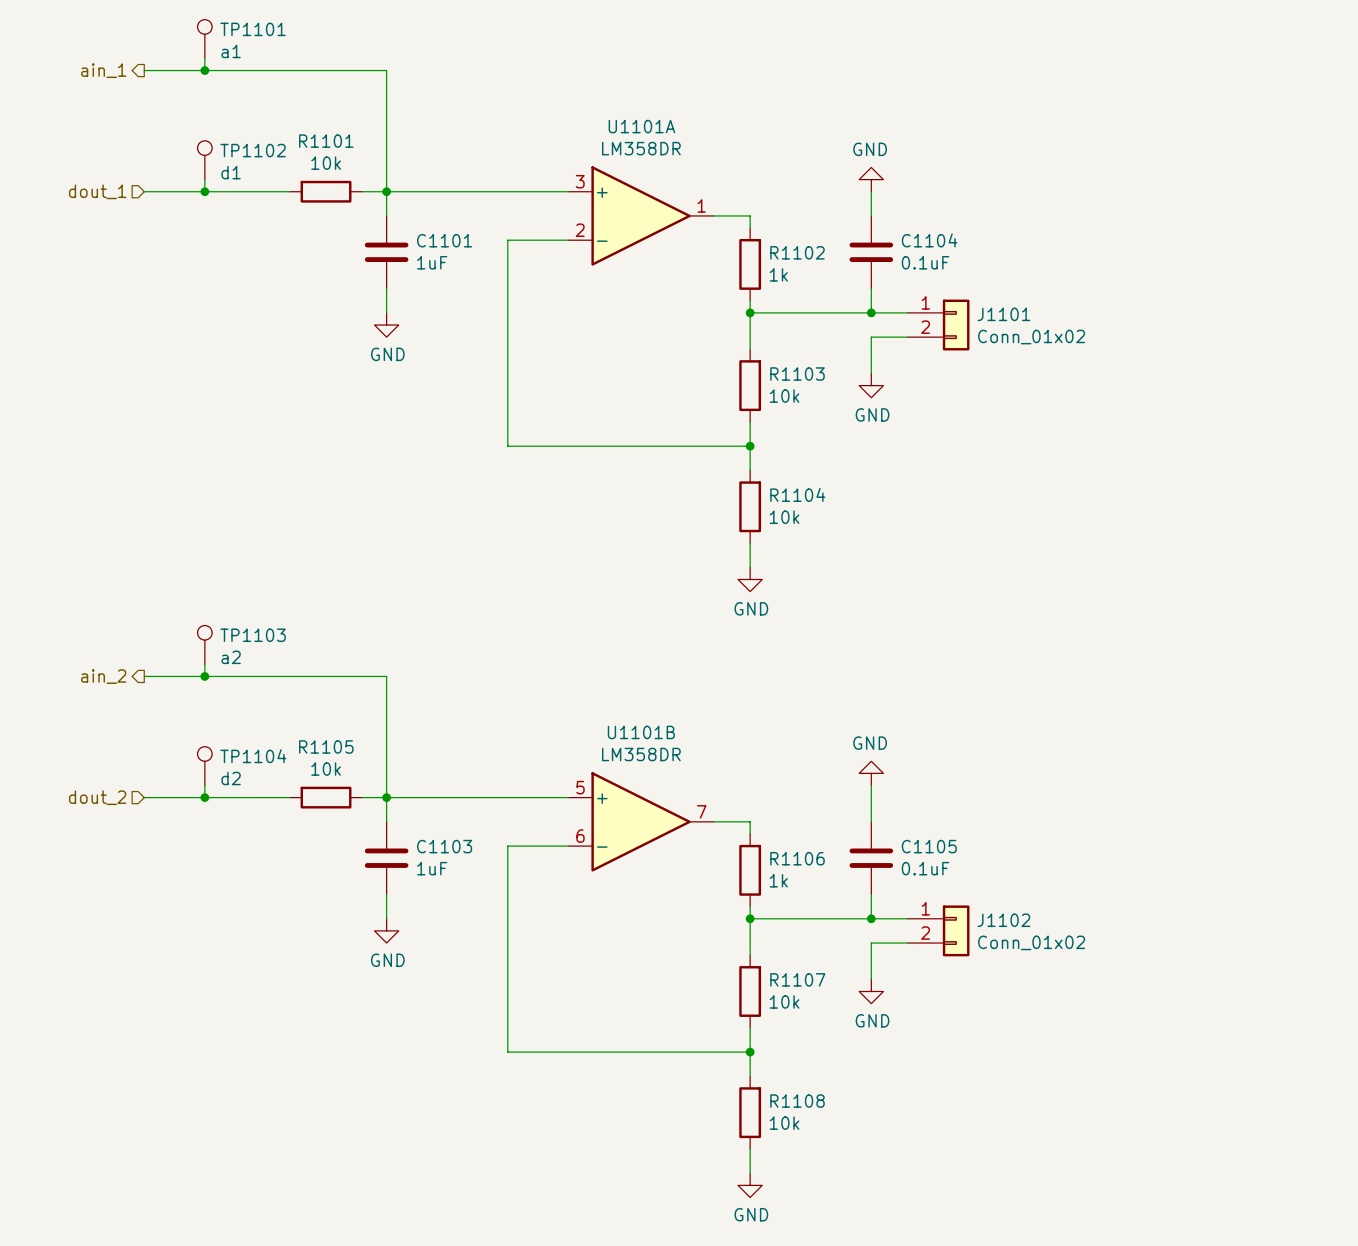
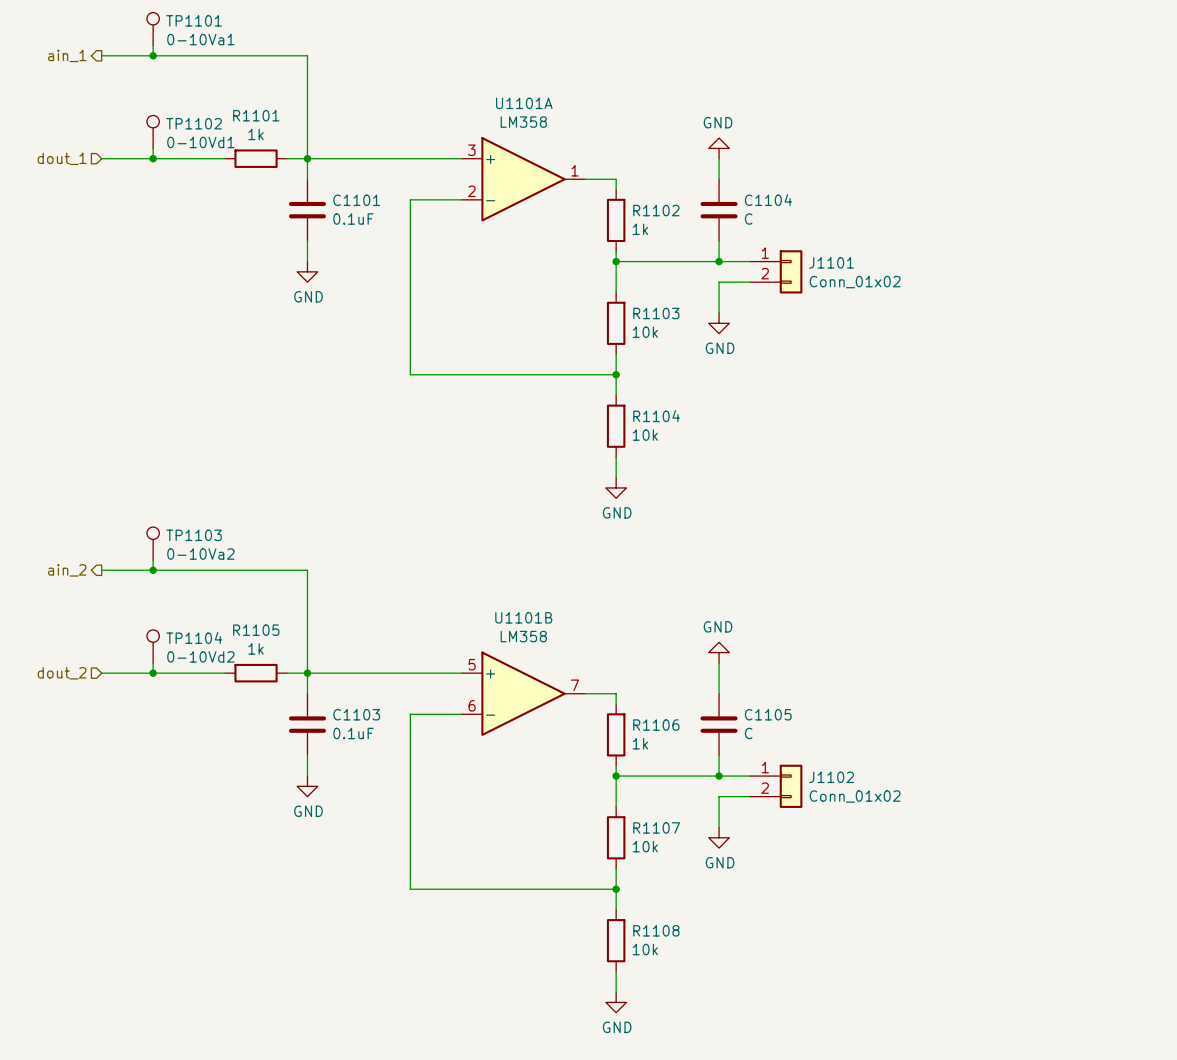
TP1101 value: a1 (231, 51) -> 0-10Va1 (200, 39)
U1101A value: LM358DR (641, 148) -> LM358 (523, 122)
R1101 value: 10k (326, 163) -> 1k (256, 134)
TP1102 value: d1 (231, 172) -> 0-10Vd1 (200, 142)
C1101 value: 1uF (432, 262) -> 0.1uF (353, 219)
C1104 value: 0.1uF (925, 262) -> C (748, 219)
TP1103 value: a2 (231, 657) -> 0-10Va2 (200, 554)
U1101B value: LM358DR (641, 754) -> LM358 (523, 636)
R1105 value: 10k (326, 769) -> 1k (256, 648)
TP1104 value: d2 (231, 778) -> 0-10Vd2 (200, 656)
C1103 value: 1uF (432, 868) -> 0.1uF (353, 733)
C1105 value: 0.1uF (925, 868) -> C (748, 733)

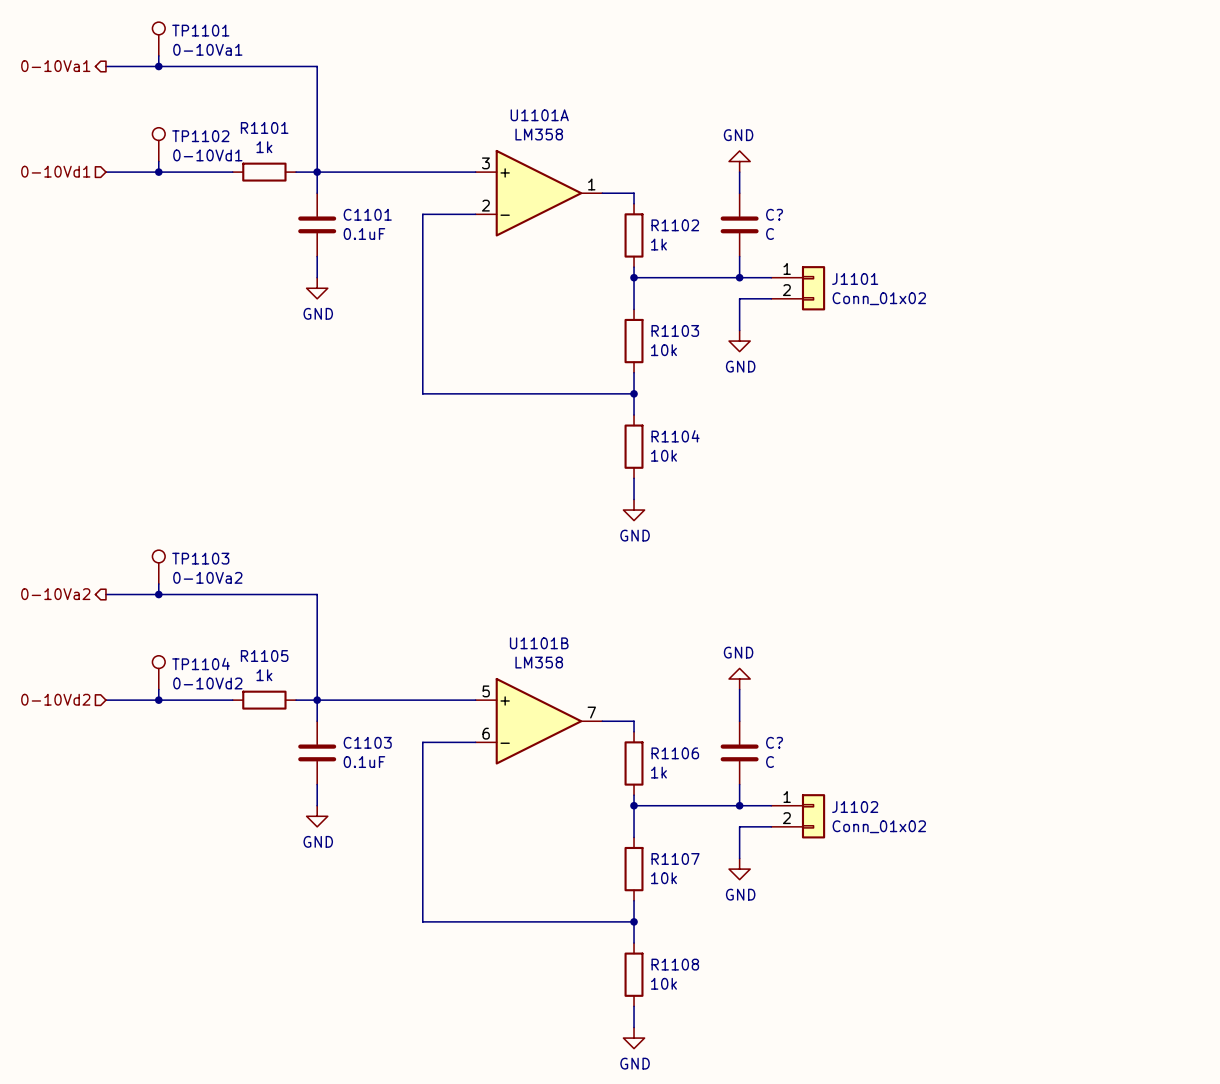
hierarchical label: ain_1 (67, 55) -> 0-10Va1 (55, 66)
hierarchical label: dout_1 (62, 158) -> 0-10Vd1 (55, 171)
C1104 name: C1104 (768, 200) -> C? (774, 214)
hierarchical label: ain_2 (67, 570) -> 0-10Va2 (55, 594)
hierarchical label: dout_2 (62, 673) -> 0-10Vd2 (55, 699)
C1105 name: C1105 (768, 714) -> C? (774, 742)

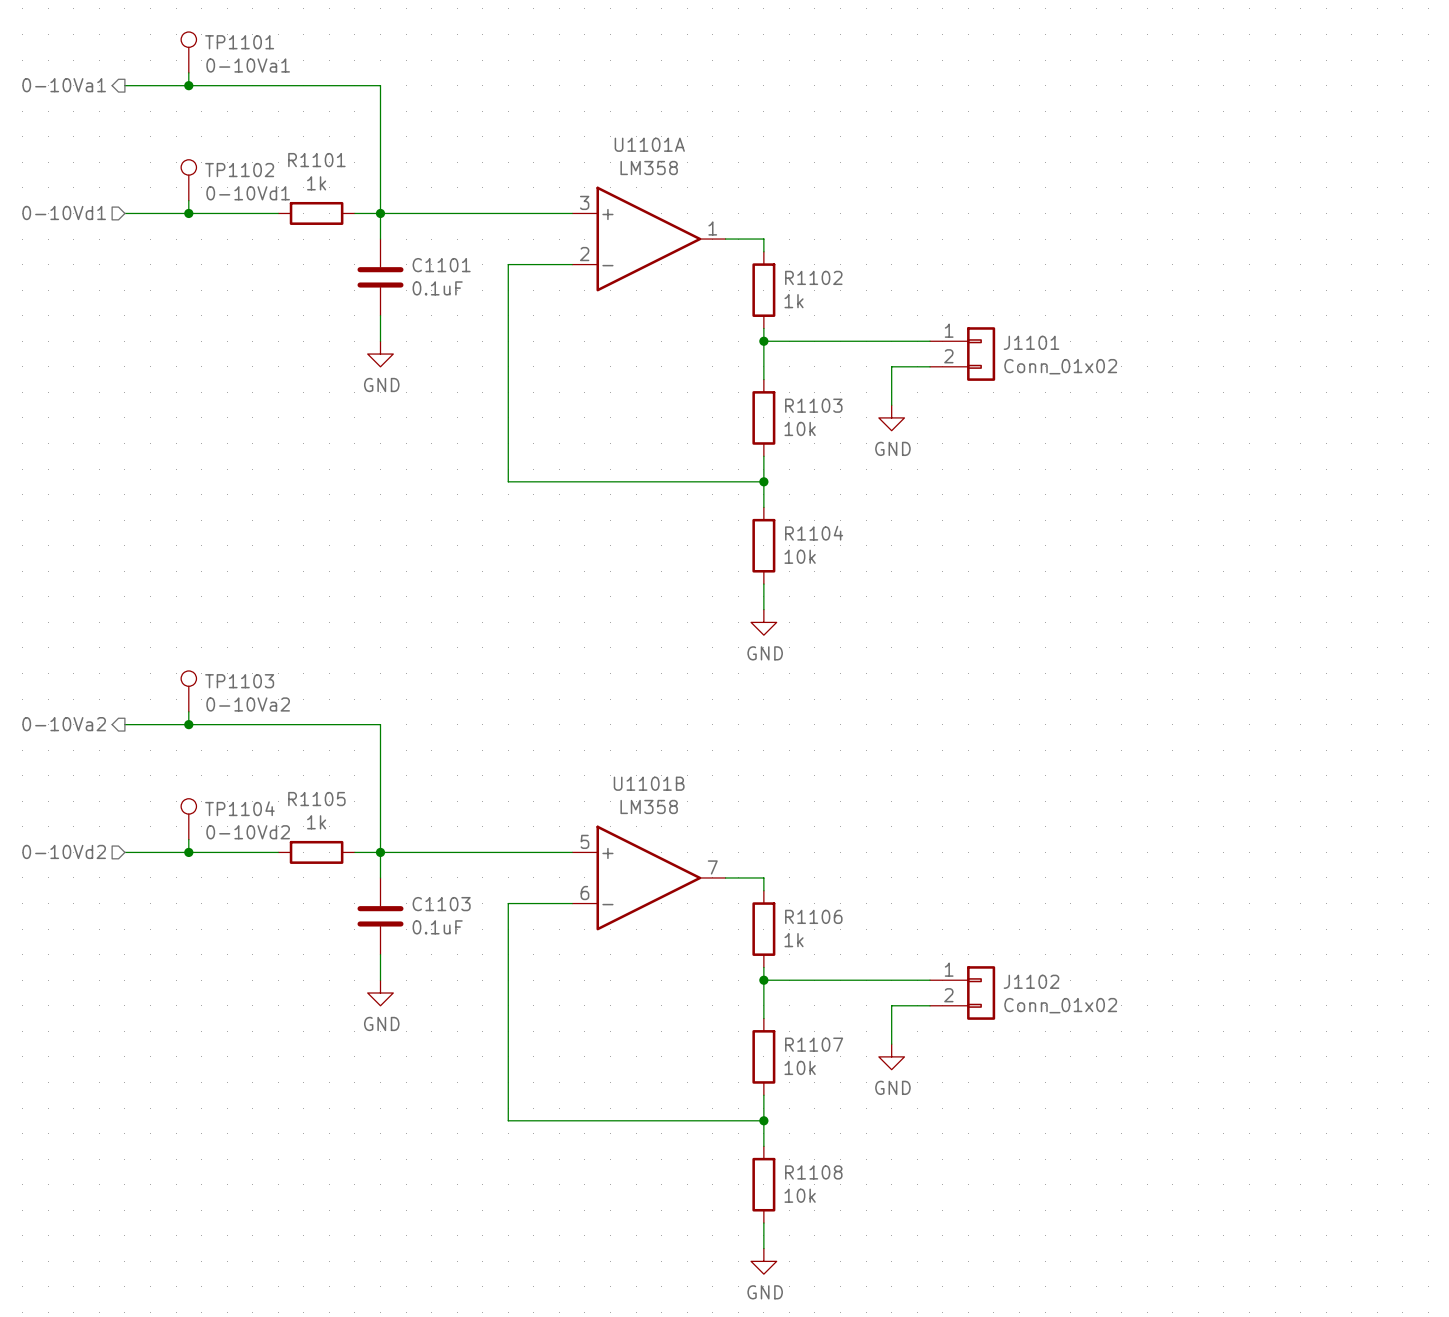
power symbol: GND (739, 161) -> none
wire: (739, 172) (739, 193) -> none
C?: C (739, 224) -> none
wire: (739, 256) (739, 277) -> none
junction: (739, 277) -> none
power symbol: GND (739, 679) -> none
wire: (739, 689) (739, 721) -> none
C?: C (739, 752) -> none
wire: (739, 784) (739, 805) -> none
junction: (739, 805) -> none

